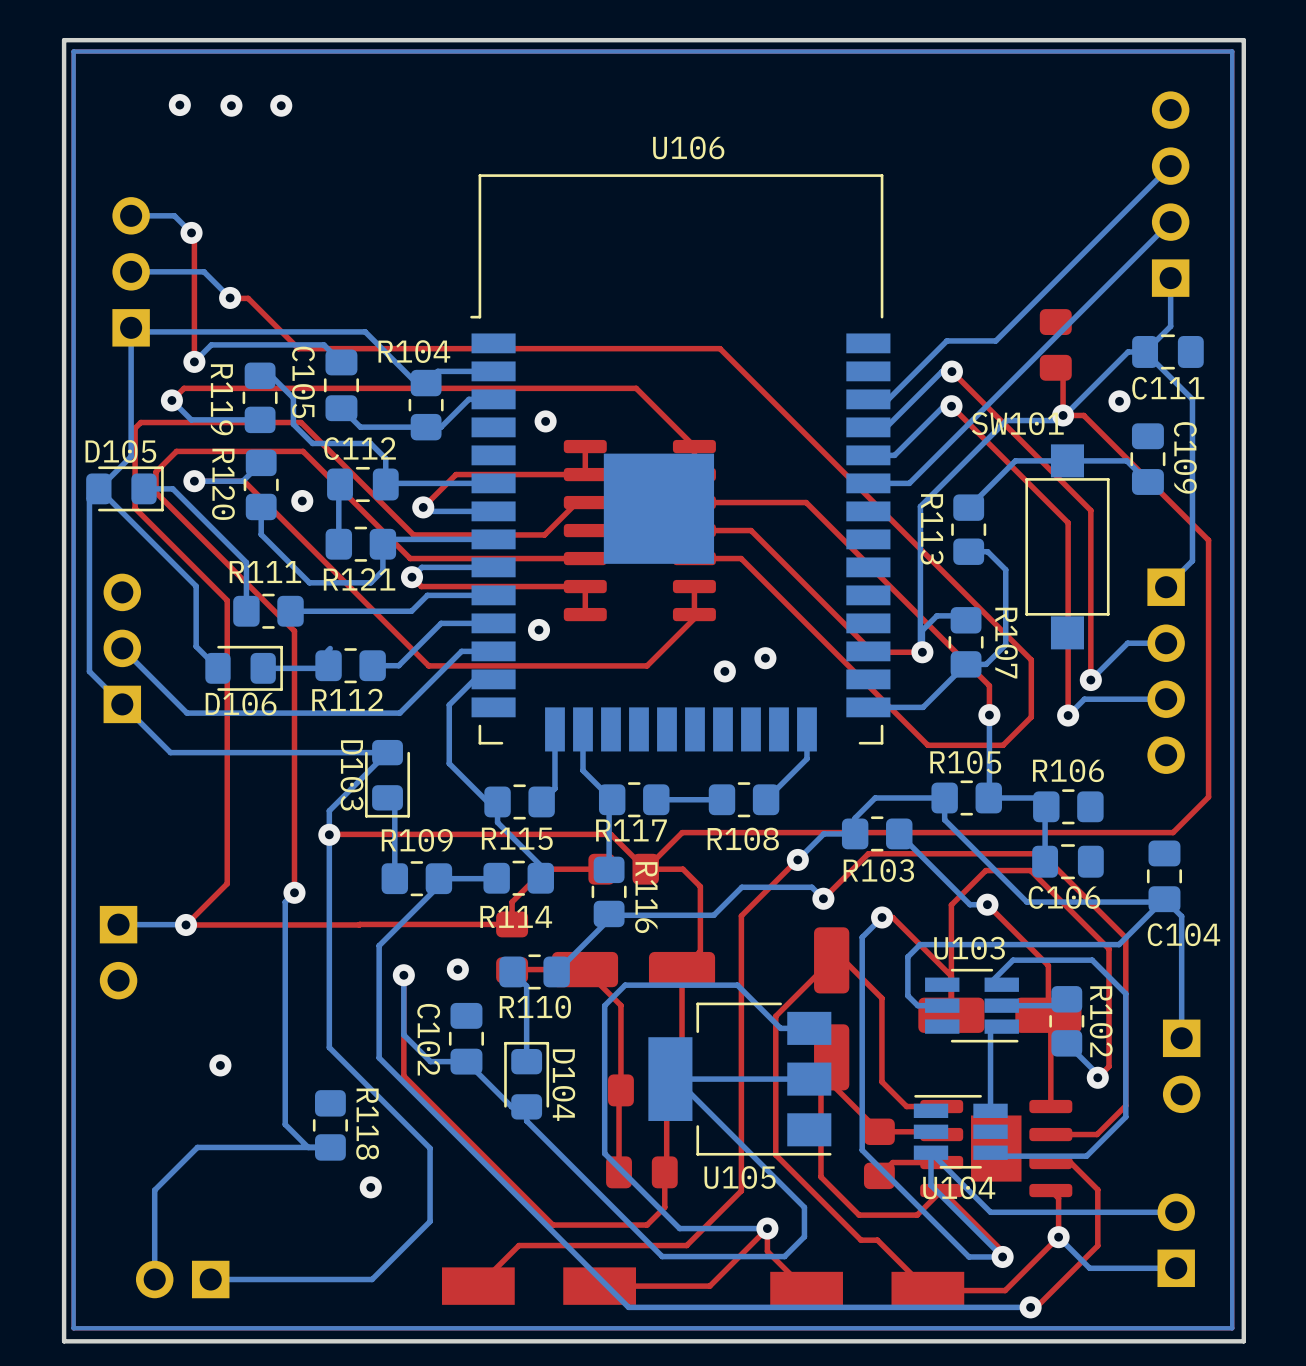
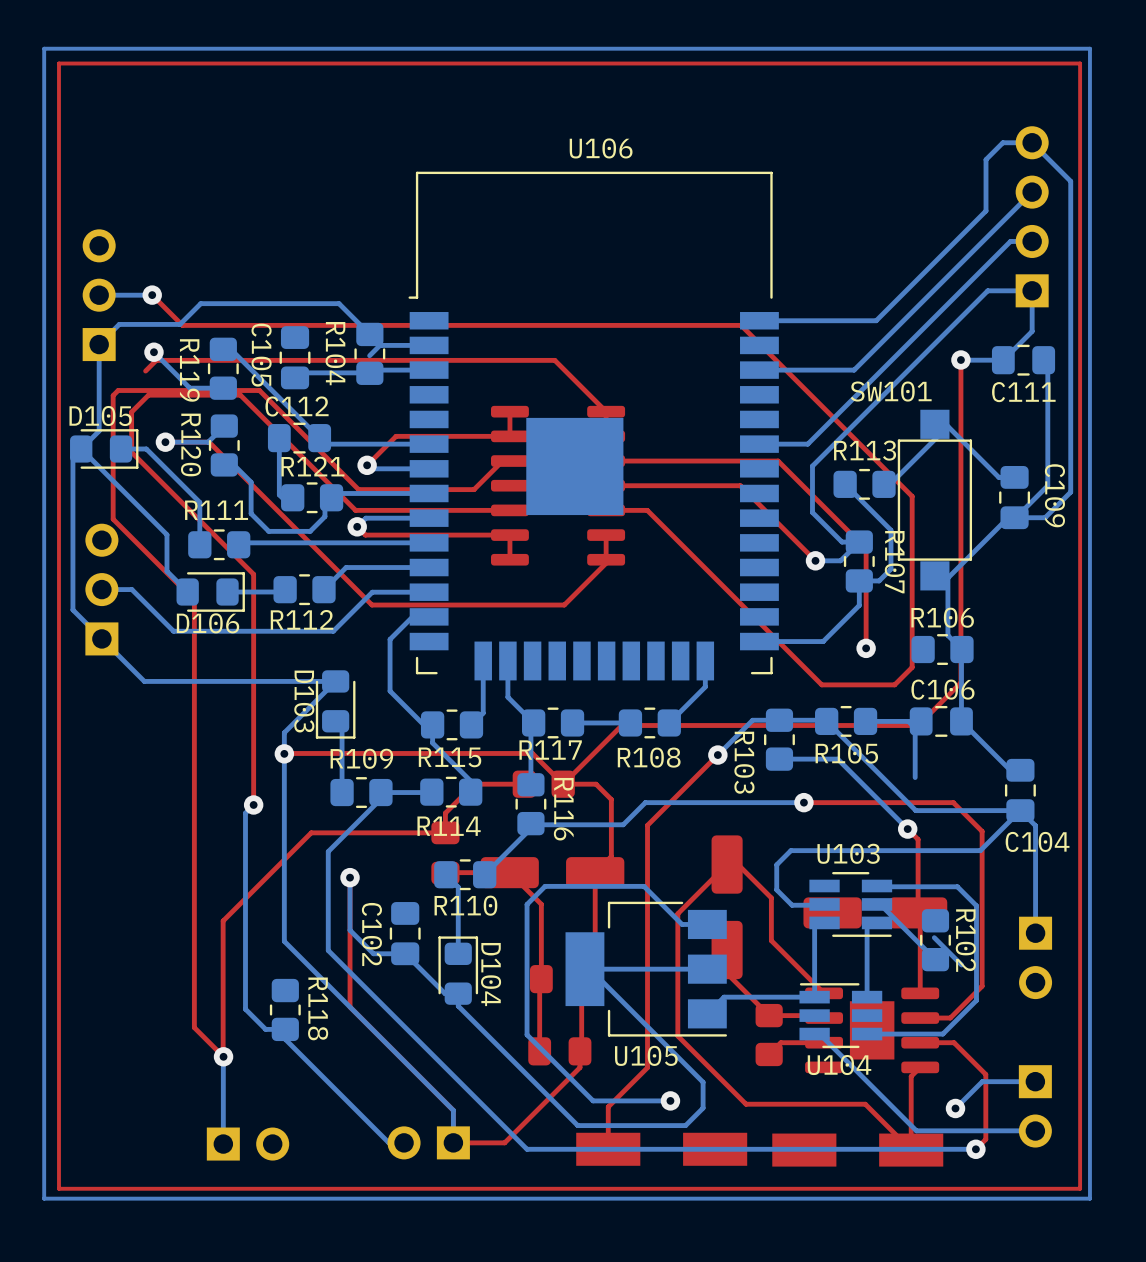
board edge: (1243, 40) (64, 40) (64, 1341) (1243, 1341) (1243, 40) -> none
bottom track: (1232, 51) (73, 51) (73, 1328) (1232, 1328) (1232, 51) -> (1089, 48) (1089, 1198) (44, 1198) (44, 48) (1089, 48)
via: (179, 105) -> none
via: (231, 105) -> none
via: (281, 105) -> none
bottom track: (1170, 166) (995, 340) (946, 340) (888, 399) -> (1032, 192) (854, 370) (777, 370)
part position: (1170, 194) -> (1032, 216)
bottom track: (131, 215) (174, 215) (191, 232) -> none
bottom track: (1170, 222) (909, 483) -> (1032, 241) (1010, 241) (807, 444) (795, 444)
top track: (191, 232) (194, 235) (194, 361) -> none
via: (191, 232) -> none
bottom track: (131, 271) (203, 271) (230, 297) -> none
part position: (131, 271) -> (99, 295)
bottom track: (1170, 278) (1170, 326) (1145, 351) -> none
top track: (230, 297) (248, 298) (298, 348) -> (152, 295) (182, 325) (257, 325)
via: (230, 297) -> none
bottom track: none -> (152, 295) (99, 295)
via: none -> (152, 295)
bottom track: none -> (759, 320) (876, 320) (986, 210) (986, 159) (1002, 142) (1032, 142) (1070, 181) (1070, 492) (1045, 517) (1008, 517) (947, 578) (947, 635) (961, 649) (961, 721) (1010, 770)
part: (1055, 344) -> none
top track: (720, 348) (1031, 659) (1031, 717) (1003, 745) (927, 745) -> (628, 325) (741, 325) (912, 496) (912, 667) (894, 684) (821, 684) (811, 674)
R104 name rotation: 0° (414, 351) -> 90° clockwise (335, 353)
bottom track: (1145, 351) (1128, 351) (1057, 420) (1006, 420) (920, 506) (920, 650) (922, 652) (922, 630) (936, 615) (961, 615) (966, 620) -> none
bottom track: (1145, 351) (1192, 399) (1192, 560) (1166, 587) -> none
C111 position: (1167, 351) -> (1023, 360)
bottom track: (194, 361) (211, 344) (323, 344) (341, 362) -> none
via: (194, 361) -> none
top track: (1055, 367) (1063, 375) (1063, 415) (1083, 415) (1208, 540) (1208, 797) (1173, 832) (682, 832) -> (960, 360) (960, 682) (918, 725) (621, 725) (595, 751)
top track: (951, 371) (1090, 510) (1090, 680) -> none
bottom track: (951, 371) (942, 371) (886, 427) (868, 427) -> none
via: (951, 371) -> none
bottom track: (268, 375) (271, 375) (293, 398) (293, 424) (312, 443) (370, 443) (385, 458) (385, 484) (386, 483) -> (230, 349) (325, 444) (335, 444)
bottom track: (426, 375) (426, 383) (416, 383) (365, 331) (135, 331) (131, 327) (131, 456) (119, 468) -> (380, 345) (339, 303) (200, 303) (180, 324) (119, 324) (99, 344) (99, 431)
via: none -> (153, 352)
via: none -> (960, 360)
bottom track: none -> (961, 360) (1003, 360) (1032, 331) (1032, 290) (987, 290) (812, 466) (812, 512) (842, 542) (859, 542) (840, 560) (815, 560)
bottom track: none -> (1043, 360) (1047, 364) (1047, 485) (1015, 517)
bottom track: (468, 399) (441, 427) (360, 427) (341, 408) -> (407, 370) (373, 370) (369, 373) (300, 372)
bottom track: (171, 400) (191, 419) (222, 419) -> (153, 352) (189, 388)
via: (171, 400) -> none
via: (1119, 401) -> none
R104 position: (426, 405) -> (369, 353)
top track: (951, 406) (1068, 522) (1068, 715) -> none
bottom track: (951, 406) (943, 406) (894, 455) (868, 455) -> none
via: (951, 406) -> none
via: (1063, 415) -> none
via: (545, 421) -> none
top track: (303, 451) (176, 451) (156, 471) -> (261, 415) (240, 395) (148, 395) (131, 412) (131, 434)
C109 name position: C109 (1185, 457) -> C109 (1054, 495)
C109 position: (1147, 459) -> (1014, 497)
bottom track: none -> (279, 438) (279, 494) (286, 501)
bottom track: (1147, 482) (1126, 460) (1015, 460) (968, 507) -> none
bottom track: (340, 484) (338, 544) -> none
C112 position: (362, 484) -> (299, 438)
via: (302, 501) -> none
top track: (806, 502) (989, 685) -> (704, 461) (778, 461) (866, 549) (866, 622)
bottom track: (261, 506) (261, 534) (309, 582) (370, 582) (382, 570) (382, 544) (387, 539) -> (233, 464) (251, 482) (251, 513) (268, 531) (310, 531) (324, 516) (324, 501) (333, 493) (335, 493)
top track: (135, 508) (227, 600) (227, 660) -> (113, 466) (113, 519) (194, 600)
bottom track: none -> (1014, 477) (998, 477) (947, 426) (890, 484) (884, 484)
R113 rotation: 0° (968, 529) -> 90° clockwise (864, 484)
top track: (751, 530) (872, 652) (922, 652) -> (656, 485) (740, 485) (815, 560)
bottom track: (233, 549) (246, 562) (246, 611) -> (199, 502) (199, 544)
bottom track: (968, 551) (987, 551) (1005, 569) (1005, 644) (986, 664) (966, 664) (923, 707) -> (845, 484) (890, 530) (890, 569) (879, 580) (859, 580) (859, 605) (823, 641) (807, 641)
R121 name position: R121 (359, 579) -> R121 (312, 466)
bottom track: (427, 595) (411, 611) (290, 611) -> (370, 542) (240, 542)
R111 position: (268, 611) -> (219, 544)
bottom track: (441, 623) (398, 665) (372, 665) -> (382, 567) (346, 567) (323, 589)
bottom track: (196, 627) (196, 646) (217, 668) -> (166, 571) (187, 592)
via: (539, 629) -> none
R107 position: (966, 642) -> (859, 561)
bottom track: (1166, 643) (1127, 643) (1090, 680) -> none
bottom track: (122, 648) (187, 713) (399, 713) (461, 651) -> (101, 589) (131, 589) (173, 631) (333, 631) (372, 592) (400, 592)
via position: (922, 652) -> (815, 560)
via: (765, 658) -> none
R112 position: (350, 665) -> (304, 589)
D106 position: (244, 668) -> (210, 592)
bottom track: (325, 668) (263, 668) -> (282, 592) (227, 592)
via: (724, 671) -> none
part: (1166, 671) -> none
via: (1090, 680) -> none
bottom track: (1166, 699) (1084, 699) (1068, 715) -> none
bottom track: (989, 715) (988, 797) -> none
via: (1068, 715) -> none
R105 name position: R105 (965, 762) -> R105 (846, 753)
R106 position: (1068, 806) -> (942, 649)
R103 rotation: 0° (877, 833) -> 90° clockwise (779, 739)
bottom track: (899, 833) (970, 904) (987, 904) -> none
top track: none -> (717, 755) (696, 776)
bottom track: none -> (717, 755) (752, 720) (825, 720) (915, 810) (1020, 810)
via: none -> (717, 755)
bottom track: none -> (779, 759) (837, 759) (907, 829)
bottom track: (797, 859) (823, 833) (855, 833) (855, 818) (875, 797) (944, 797) (944, 819) (1026, 902) (1161, 902) -> none
via: (797, 859) -> none
C106 position: (1067, 861) -> (941, 721)
top track: (227, 883) (186, 924) (359, 924) -> (194, 797) (194, 1027) (223, 1056)
bottom track: (738, 890) (741, 887) (811, 887) (823, 898) -> (645, 802) (803, 802)
via: none -> (803, 802)
C106 name position: C106 (1064, 897) -> C106 (942, 689)
top track: (823, 898) (868, 853) (1041, 853) (1125, 937) (1125, 1105) (1097, 1134) (1085, 1134) -> (803, 802) (953, 802) (982, 831) (982, 986) (950, 1018)
via: (823, 898) -> none
top track: (987, 904) (1048, 965) -> (907, 829) (918, 839) (918, 869)
via: (987, 904) -> none
top track: (882, 917) (892, 917) (951, 976) -> none
bottom track: (882, 917) (862, 937) (862, 1150) (969, 1256) (1002, 1256) (931, 1185) (931, 1152) (990, 1212) (1176, 1212) -> none
via: (882, 917) -> none
via: none -> (907, 829)
bottom track: (118, 924) (186, 924) -> none
via: (186, 924) -> none
top track: none -> (310, 833) (223, 920) (223, 1056)
bottom track: (920, 944) (907, 956) (907, 995) (917, 1005) (942, 1005) -> (805, 850) (790, 850) (776, 864) (776, 889) (792, 905) (812, 905)
part: (118, 952) -> none
via: (457, 969) -> none
bottom track: (987, 985) (1013, 960) (1092, 960) (1125, 993) (1125, 1116) (1086, 1156) (993, 1156) (990, 1152) -> (864, 886) (957, 886) (976, 905) (976, 1000) (942, 1034) (867, 1034)
bottom track: (1066, 999) (1060, 1005) (1001, 1005) -> none
bottom track: none -> (864, 905) (881, 905) (935, 959)
top track: (951, 1015) (951, 904) (985, 870) (1030, 870) (1109, 948) (1109, 1066) (1097, 1077) -> none
R102 position: (1066, 1021) -> (935, 940)
bottom track: none -> (812, 923) (814, 926) (814, 997) (724, 997) (707, 1013)
top track: (881, 1046) (881, 1081) (906, 1106) (941, 1106) -> (771, 940) (824, 993)
top track: (831, 1057) (820, 1068) (820, 1176) (859, 1215) (917, 1215) (941, 1190) (1002, 1251) (1002, 1256) -> none
via: (220, 1065) -> none
top track: (403, 1076) (552, 1225) (647, 1225) (664, 1207) (664, 1190) -> (350, 966) (350, 1007) (453, 1110) (453, 1142) (504, 1142) (579, 1067)
via: (1097, 1077) -> none
bottom track: (308, 1147) (197, 1147) (154, 1190) (154, 1279) -> none
bottom track: none -> (285, 1029) (285, 1039) (388, 1142) (404, 1142)
bottom track: (430, 1148) (430, 1221) (372, 1279) (210, 1279) -> (373, 1030) (453, 1110) (453, 1142)
bottom track: none -> (814, 1034) (819, 1034) (916, 1130) (1035, 1130)
top track: (1070, 1162) (1097, 1189) (1097, 1245) (1036, 1307) (1030, 1307) -> (937, 1042) (954, 1042) (985, 1074) (985, 1139) (975, 1149)
bottom track: none -> (223, 1056) (223, 1144)
via: none -> (223, 1056)
via: (370, 1187) -> none
top track: (1050, 1190) (1058, 1198) (1058, 1237) (1005, 1290) (927, 1290) (877, 1240) (861, 1240) (853, 1232) -> (920, 1067) (911, 1076) (911, 1150) (865, 1104) (746, 1104)
bottom track: none -> (1035, 1081) (982, 1081) (955, 1108)
top track: (696, 1235) (686, 1245) (518, 1245) (478, 1286) -> (608, 1106) (608, 1149)
bottom track: (1058, 1237) (1089, 1268) (1176, 1268) -> none
via position: (1058, 1237) -> (955, 1108)
part rotation: 0° (1176, 1240) -> 180° (1035, 1106)
via: (1002, 1256) -> none
part: none -> (428, 1142)
part rotation: 0° (182, 1279) -> 180° (248, 1144)
part position: (182, 1279) -> (248, 1144)
bottom track: (604, 1283) (628, 1307) (1030, 1307) -> (527, 1149) (975, 1149)
part: none -> (661, 1149)
via: none -> (975, 1149)
part: none -> (857, 1150)
part: (539, 1286) -> none
top track: (599, 1286) (709, 1286) (767, 1228) (767, 1251) (806, 1290) -> none
part: (867, 1290) -> none
via: (1030, 1307) -> none

